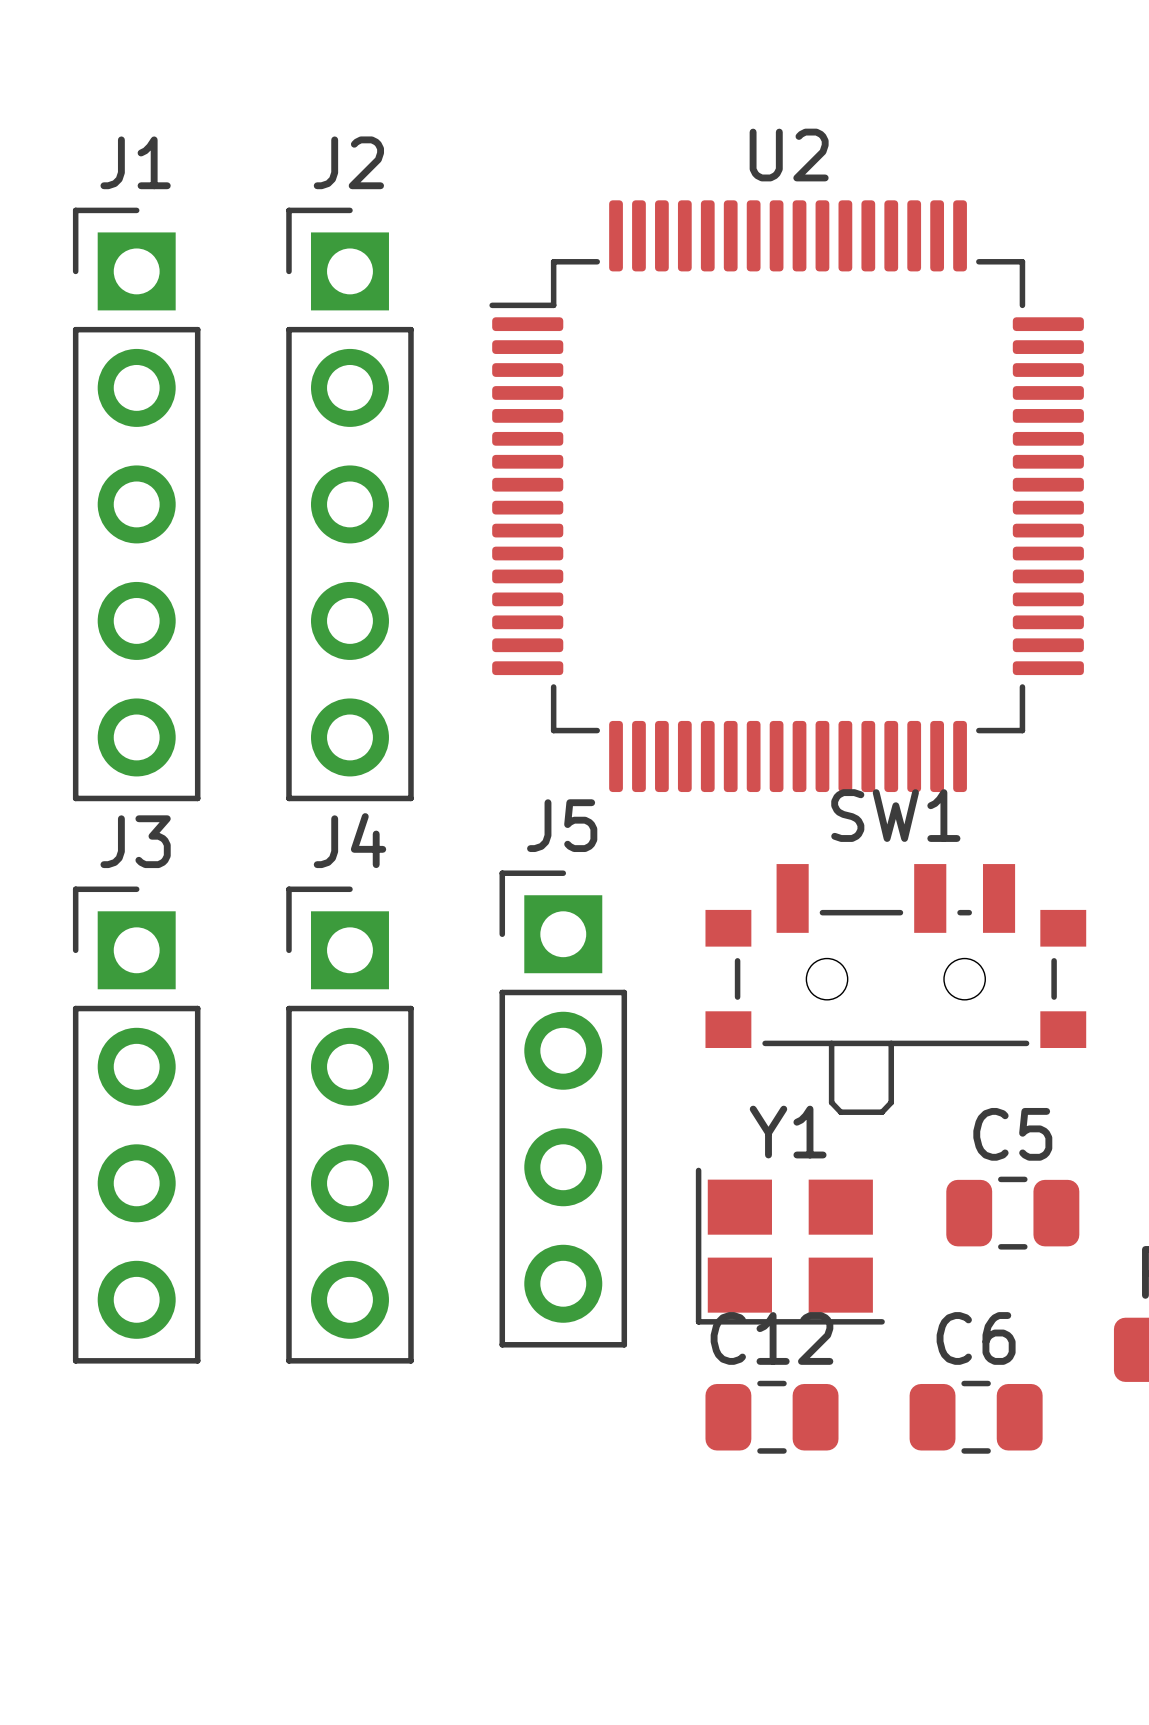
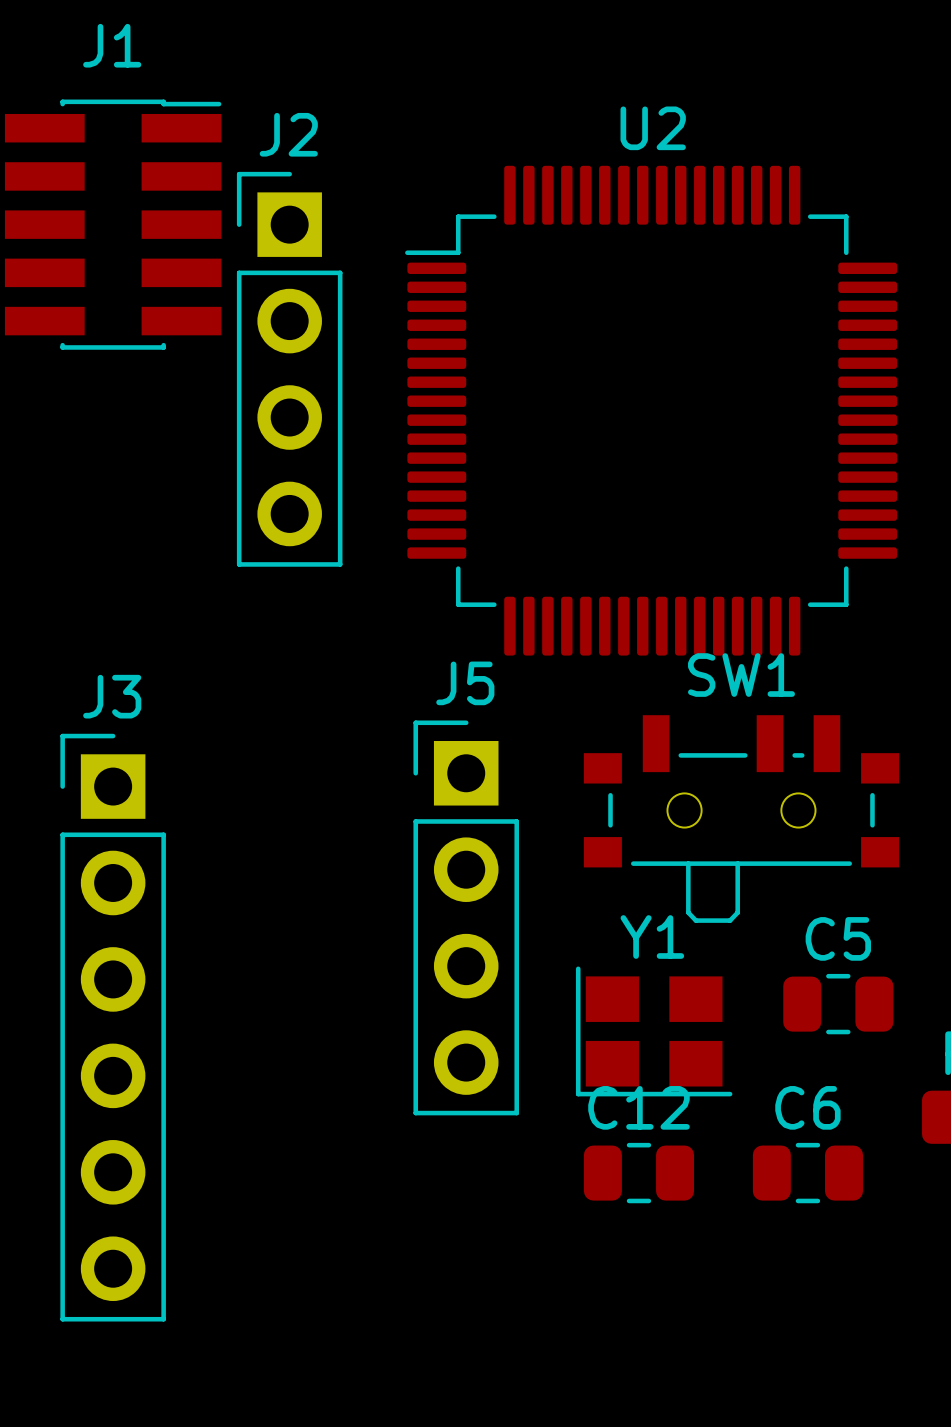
J1 name position: J1 (135, 162) -> J1 (112, 45)
J1 footprint: [72, 207, 201, 802] -> [4, 99, 222, 350]
J2 footprint: [286, 207, 414, 802] -> [236, 171, 343, 567]
J3 footprint: [72, 886, 201, 1364] -> [60, 733, 166, 1322]
J4: (349, 1125) -> none

